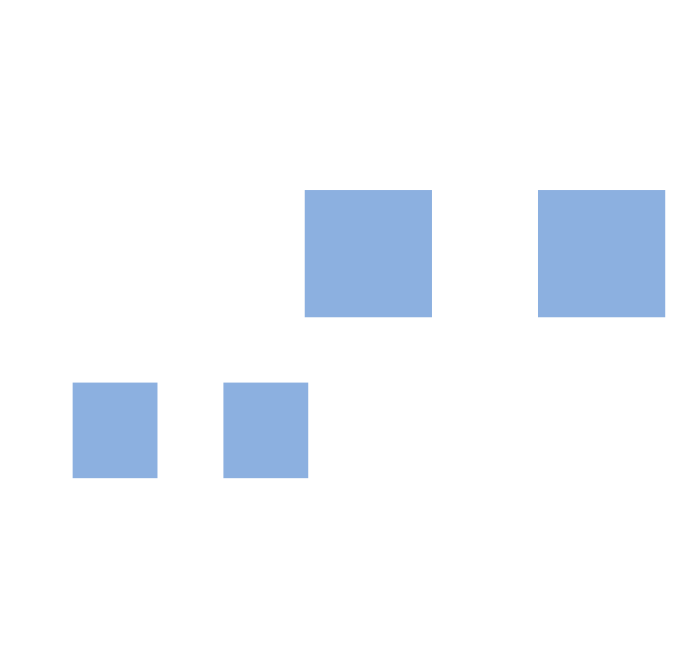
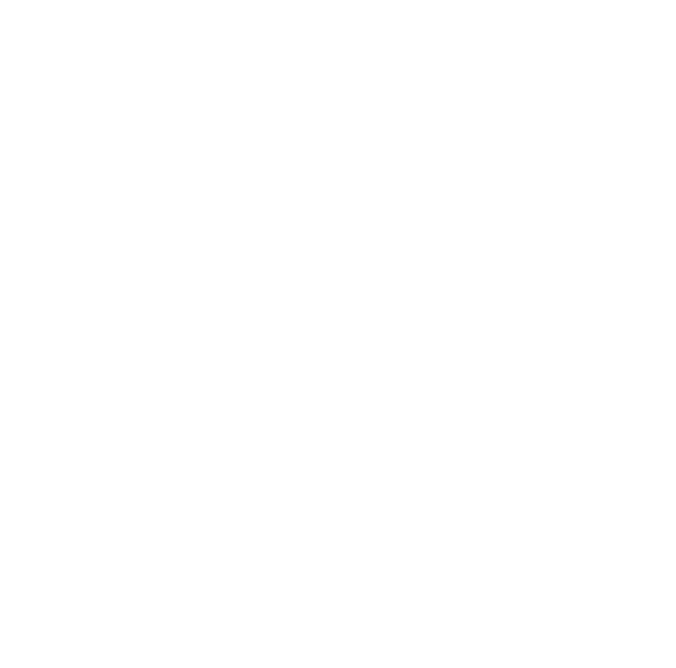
part: (484, 253) -> none
part: (190, 430) -> none

